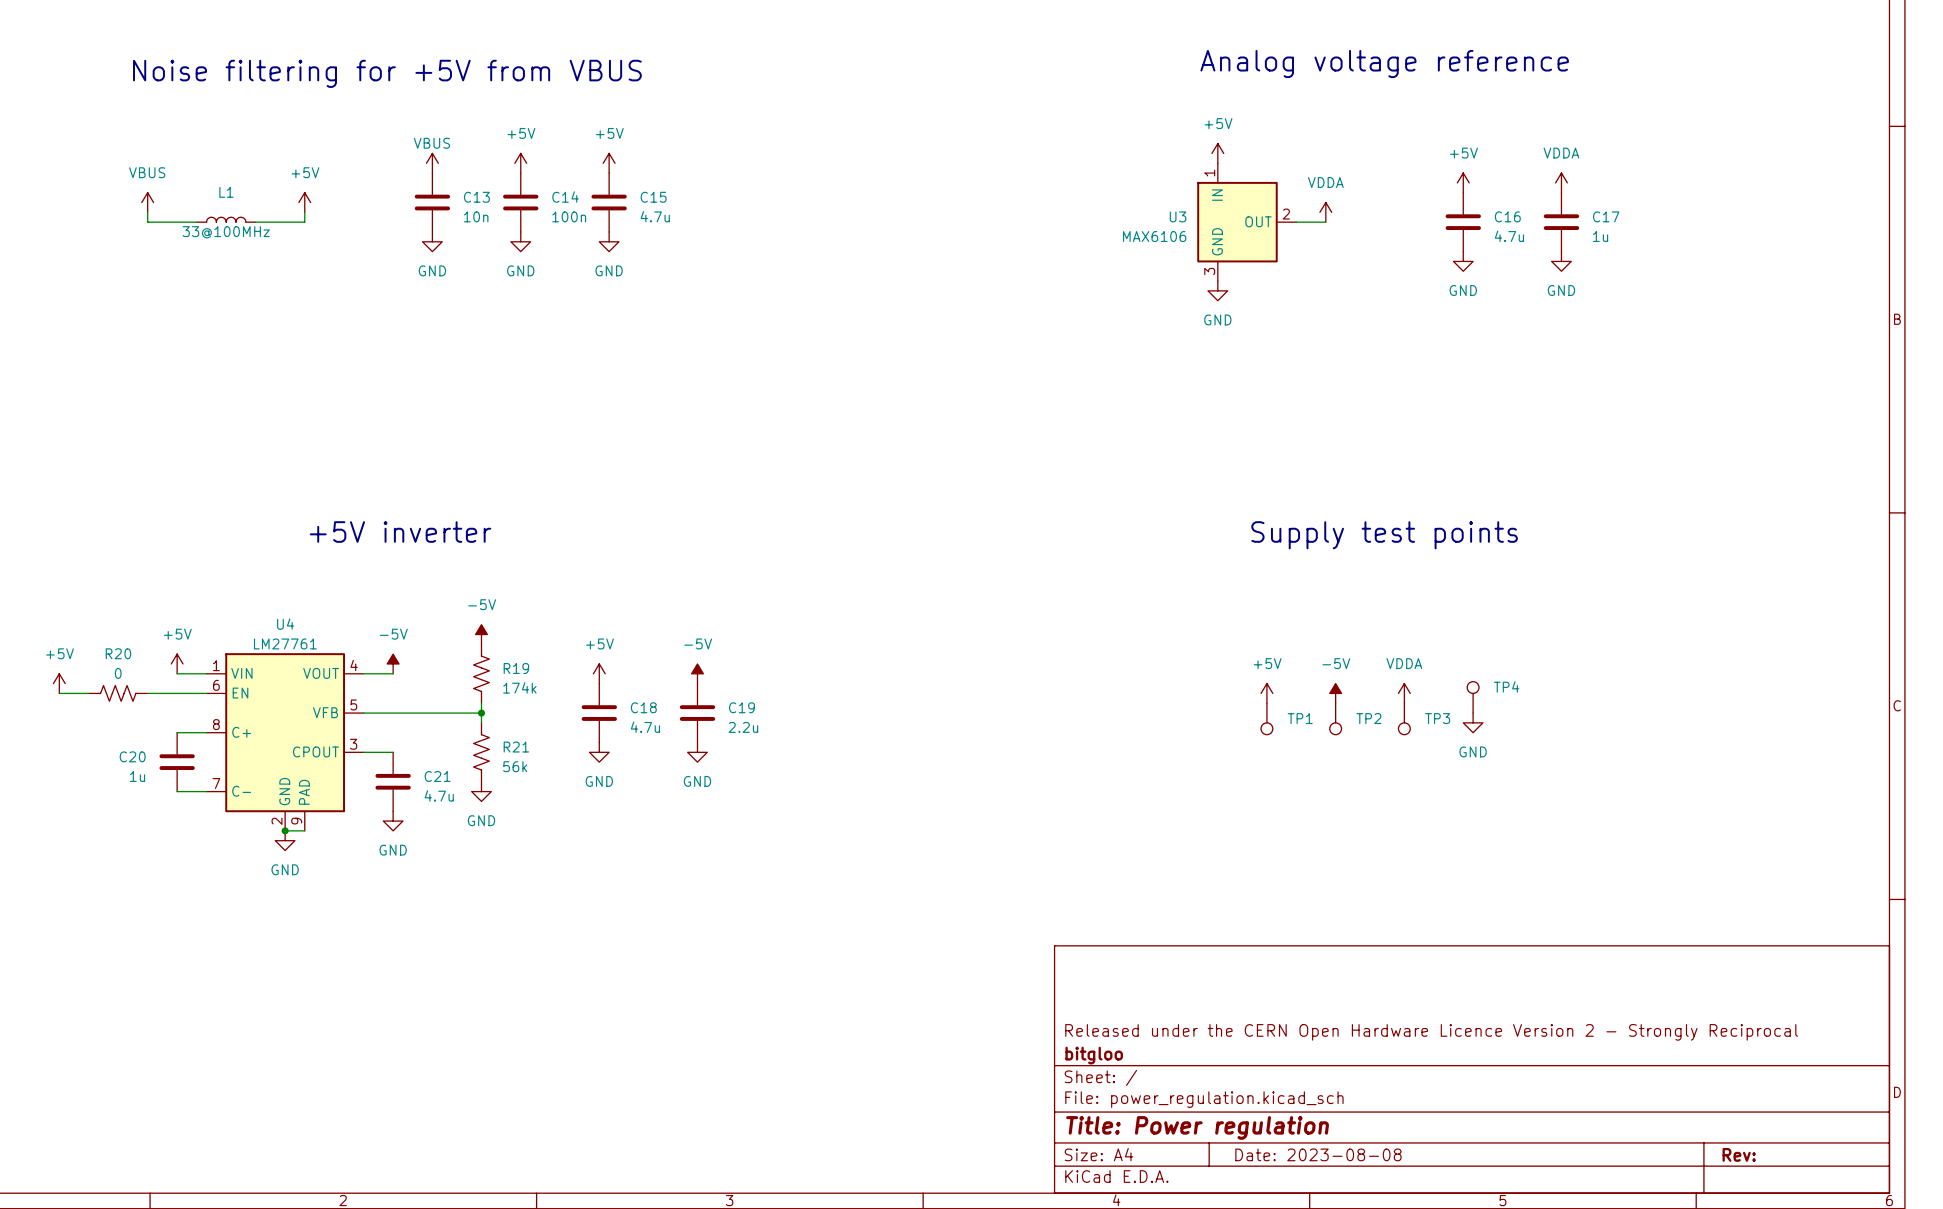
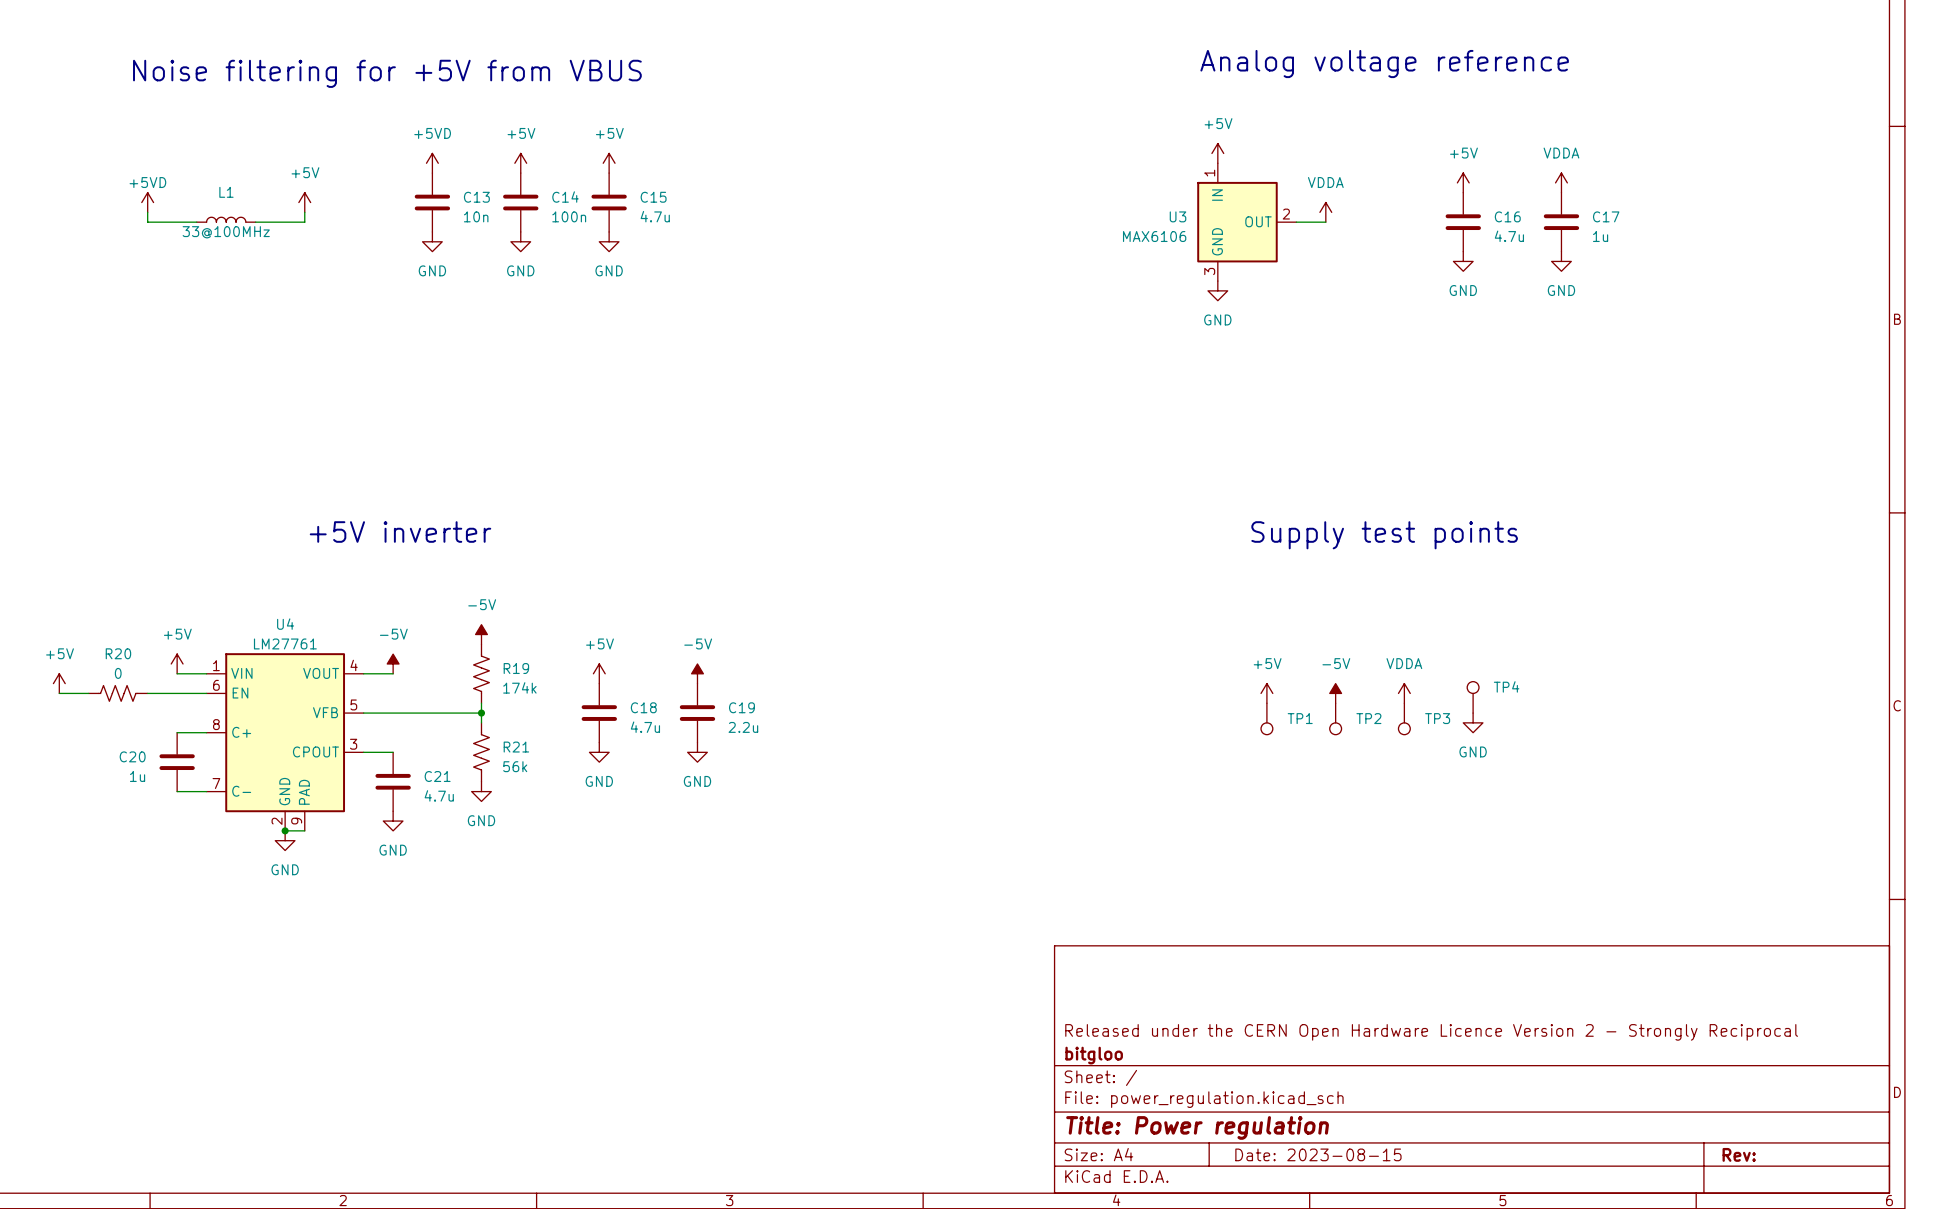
power symbol: VBUS (432, 163) -> +5VD (432, 163)
power symbol: VBUS (147, 202) -> +5VD (147, 202)
title block: Date: 2023-08-08 (1318, 1154) -> Date: 2023-08-15 (1318, 1154)

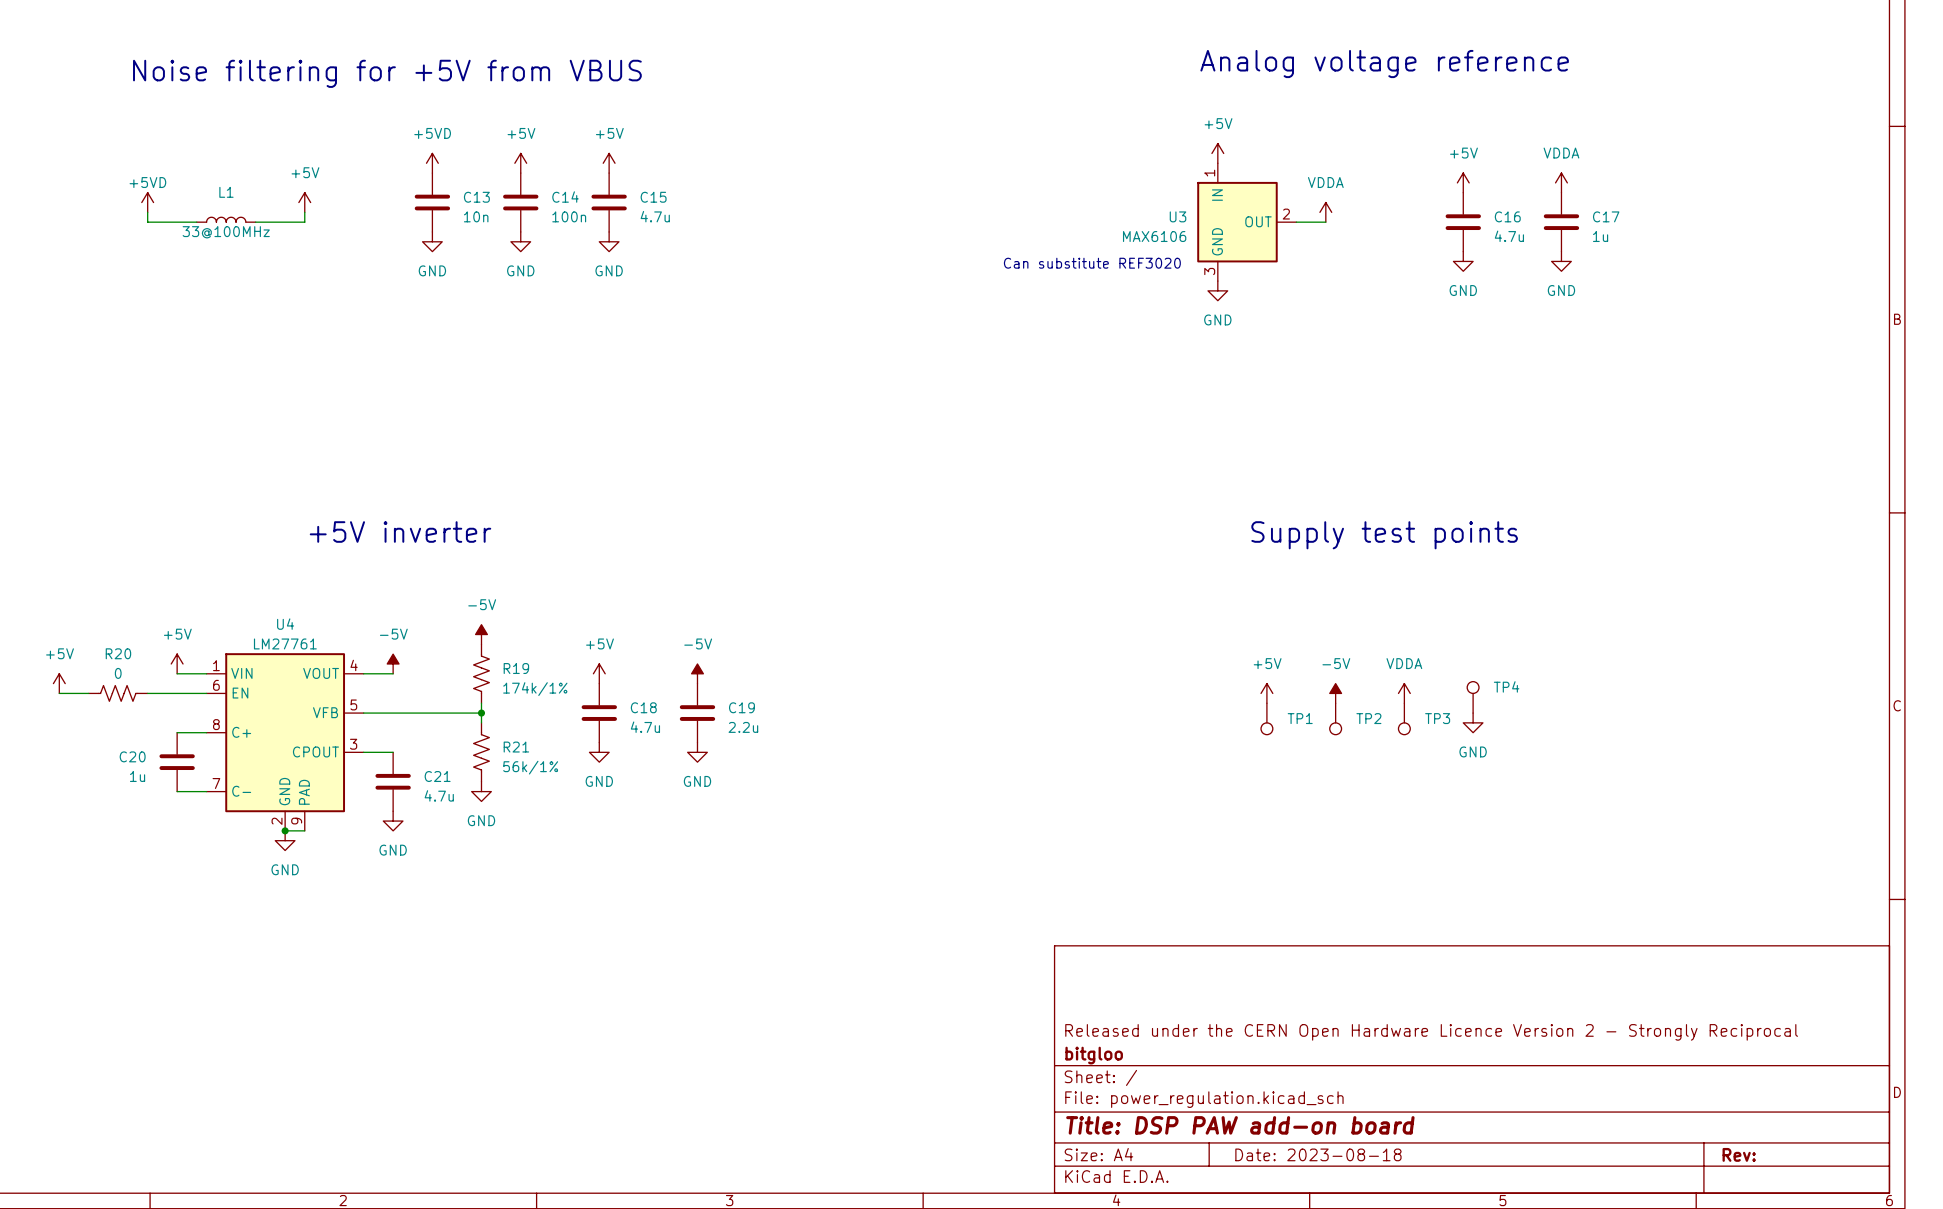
text: none -> Can substitute REF3020 (1092, 263)
R19 value: 174k (519, 687) -> 174k/1% (535, 689)
R21 value: 56k (515, 766) -> 56k/1% (530, 767)
title block: Title: Power regulation (1197, 1127) -> Title: DSP PAW add-on board (1240, 1125)
title block: Date: 2023-08-15 (1318, 1154) -> Date: 2023-08-18 (1318, 1154)

